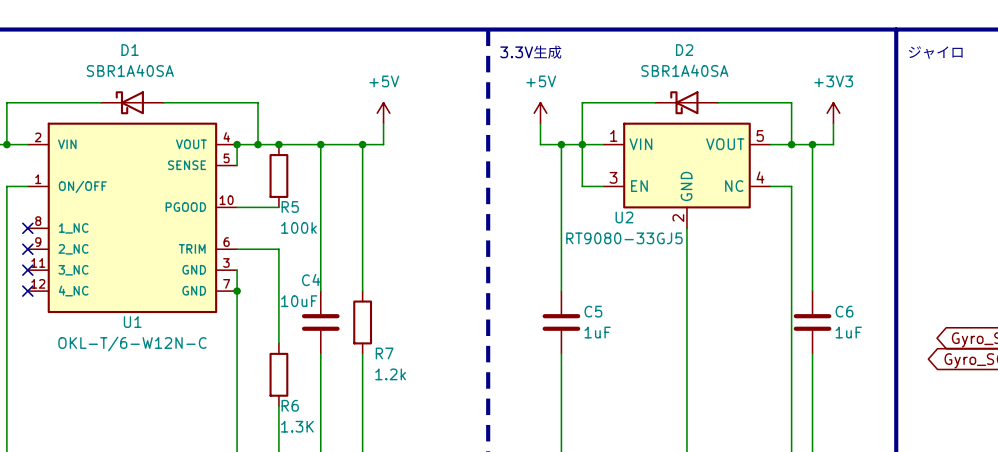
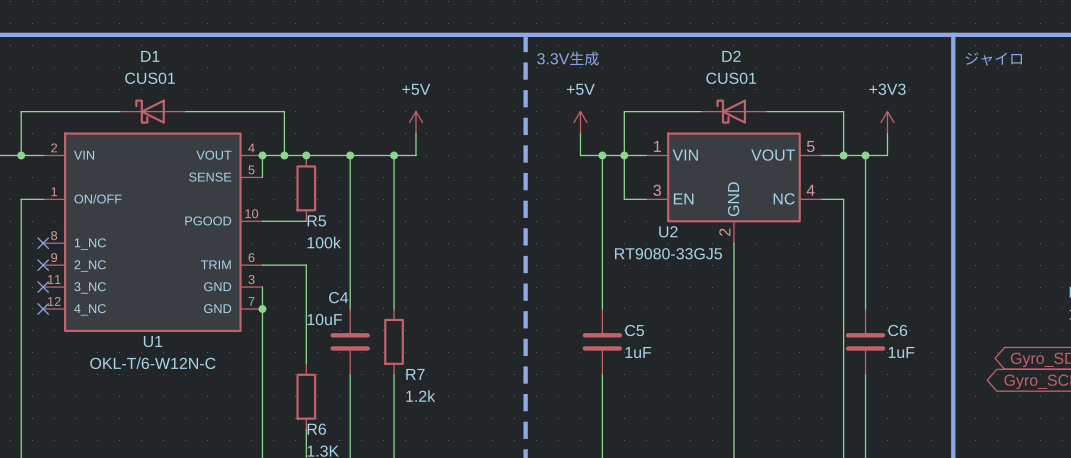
D1 value: SBR1A40SA (130, 70) -> CUS01 (150, 78)
D2 value: SBR1A40SA (684, 70) -> CUS01 (731, 78)

